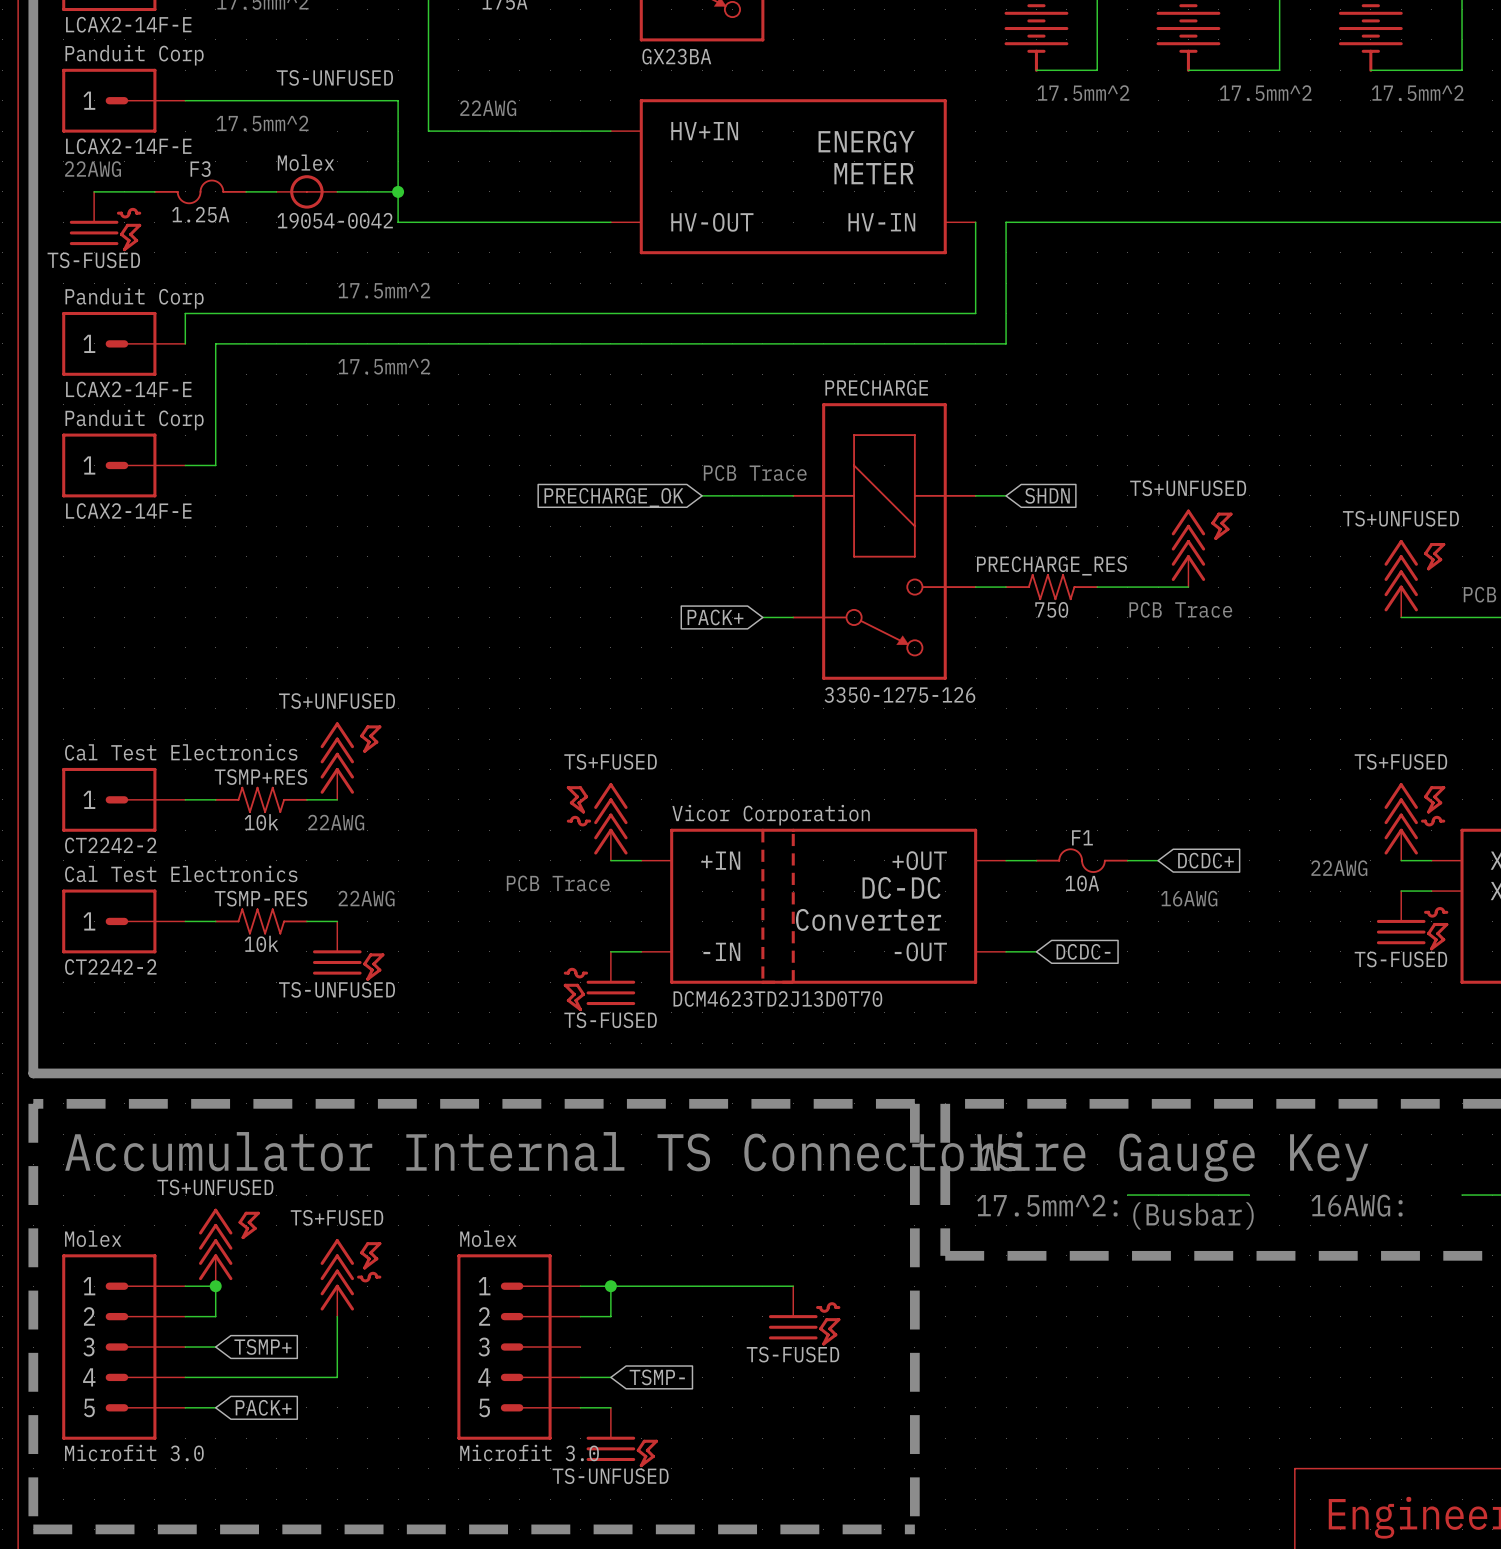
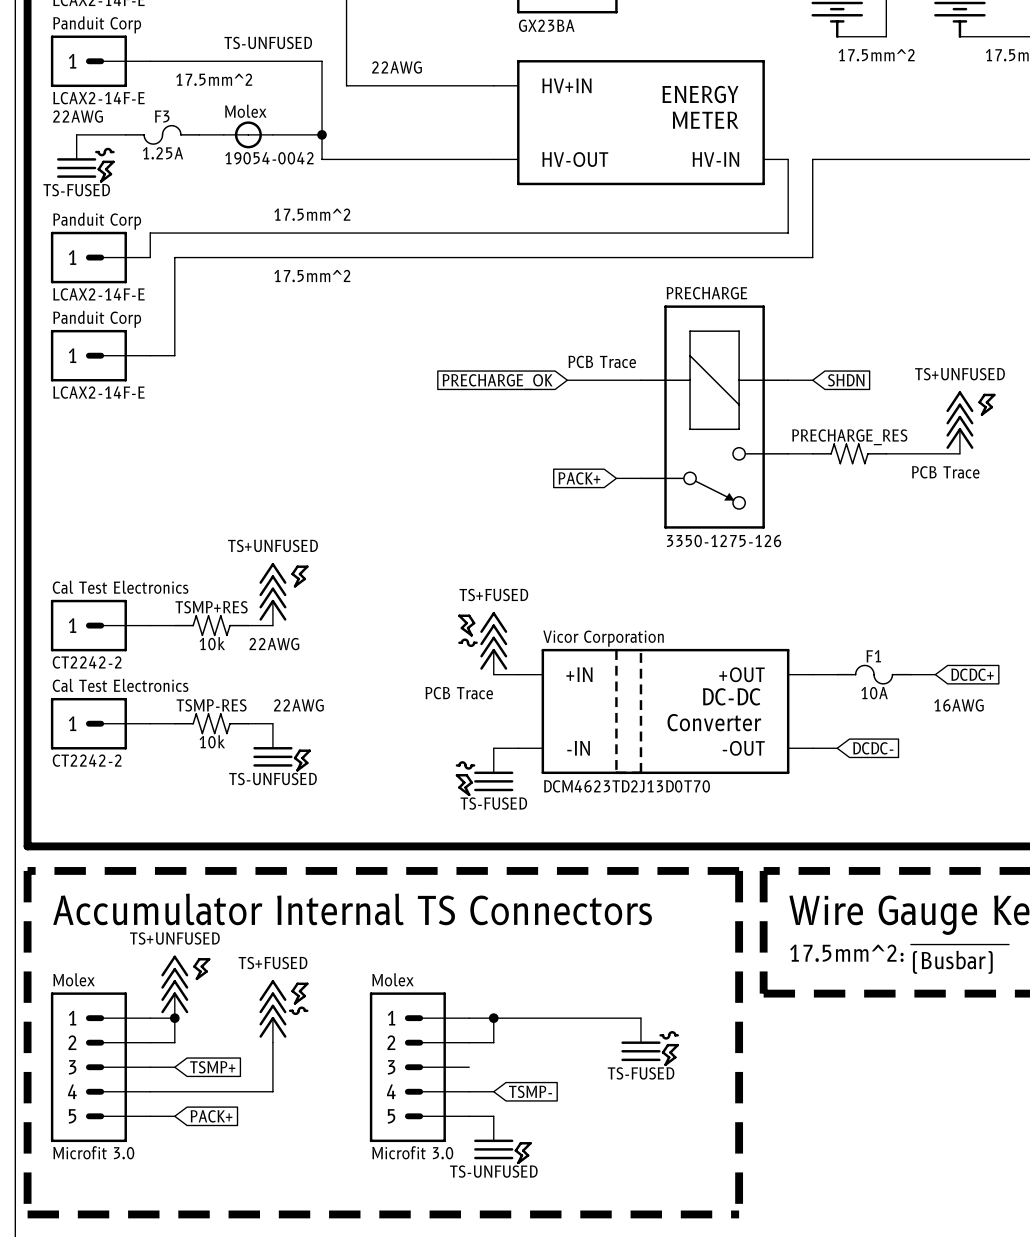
PRECHARGE_RES value: 750 (1051, 609) -> none

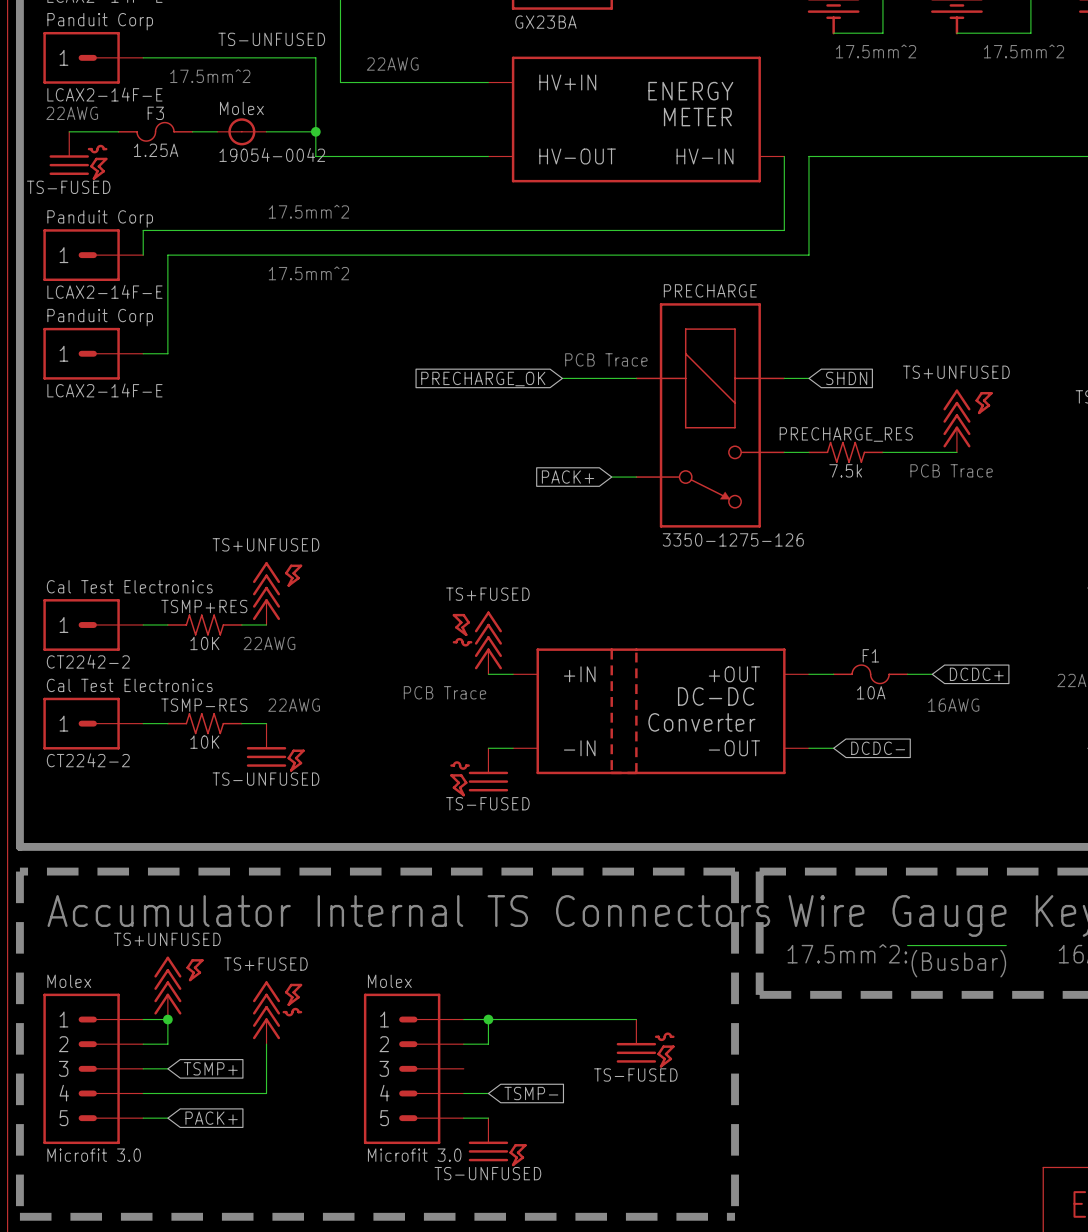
PRECHARGE_RES value: none -> 7.5k (845, 470)
part text: Vicor Corporation (603, 638) -> none
TSMP+RES value: 10k (212, 643) -> 10K (204, 643)
TSMP-RES value: 10k (212, 741) -> 10K (204, 742)
part text: DCM4623TD2J13D0T70 (627, 786) -> none

